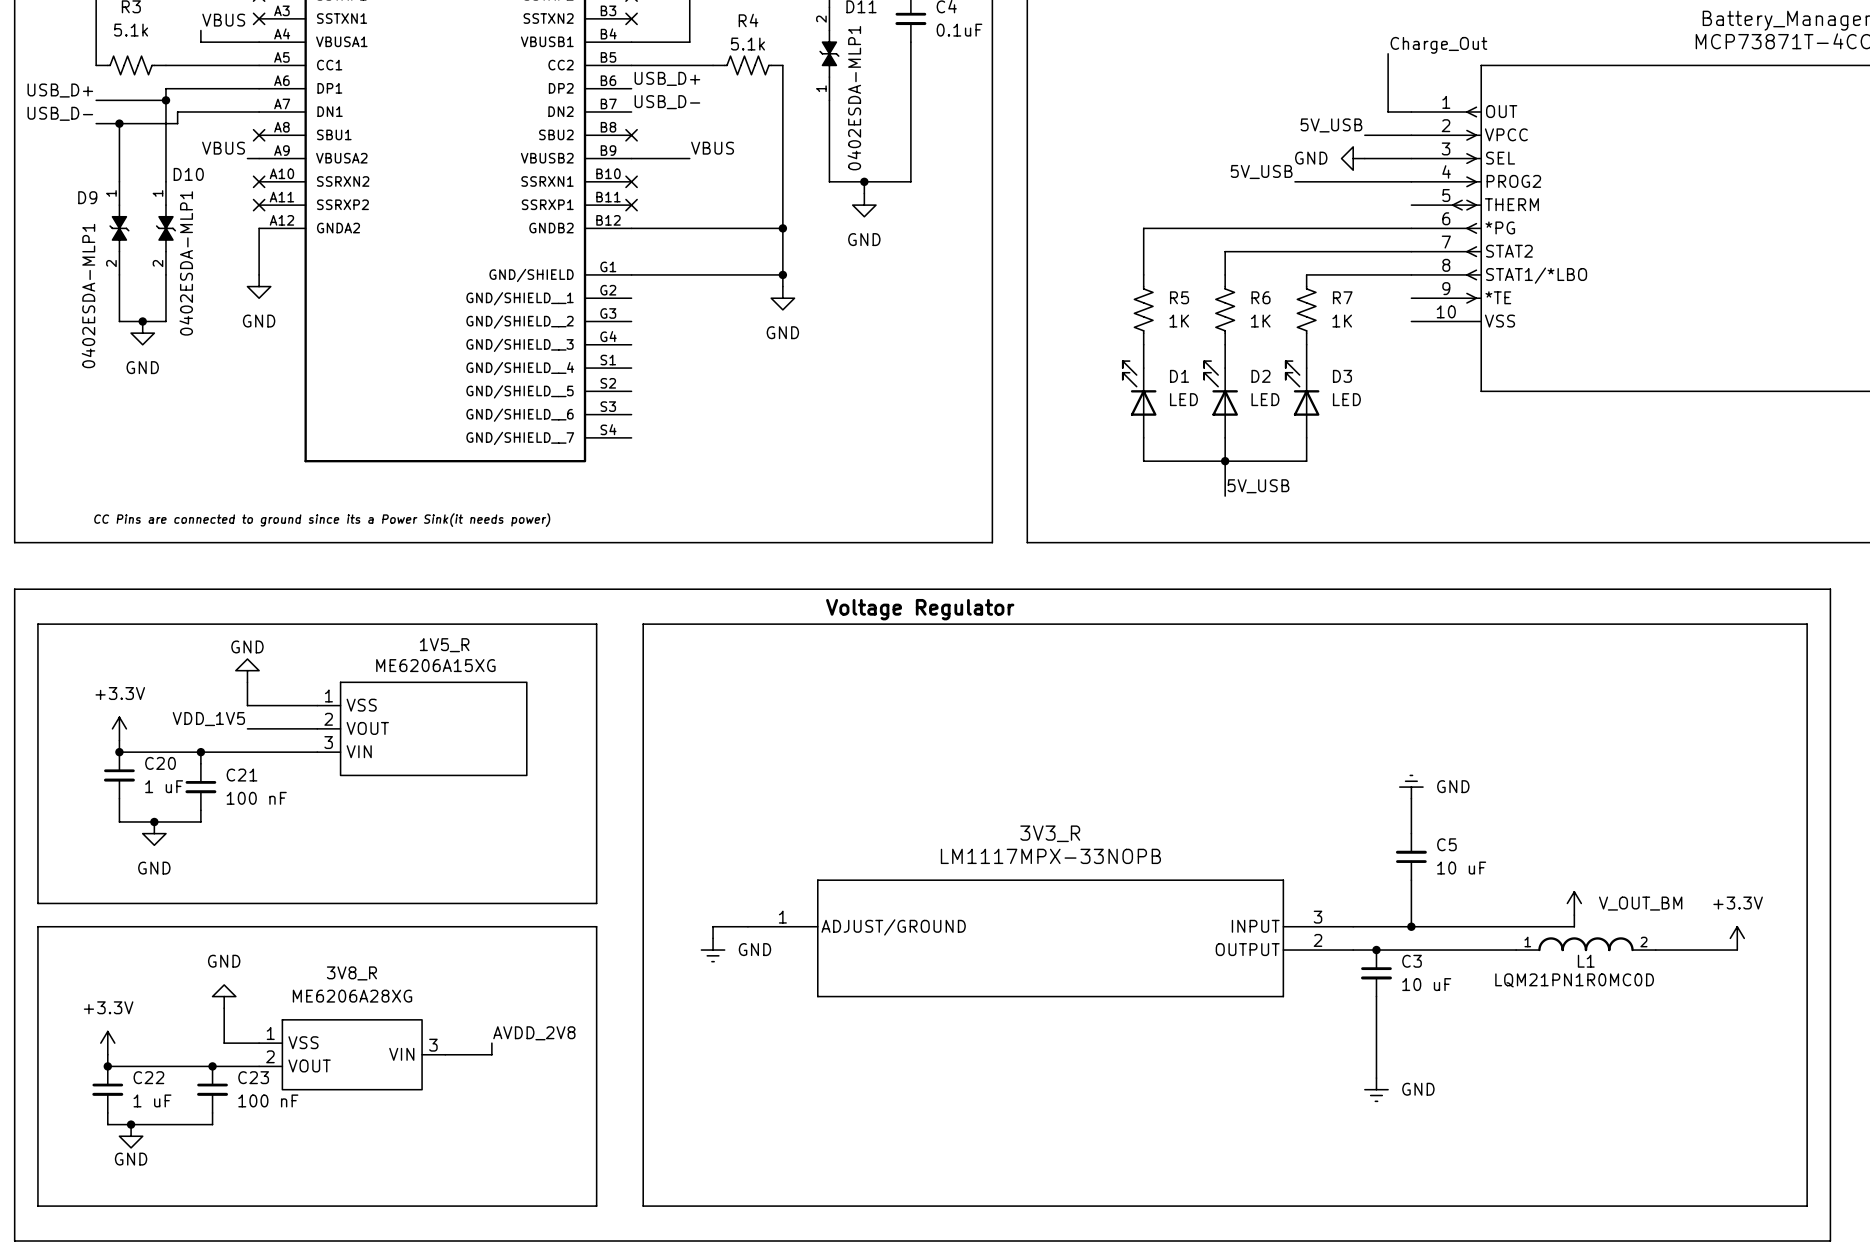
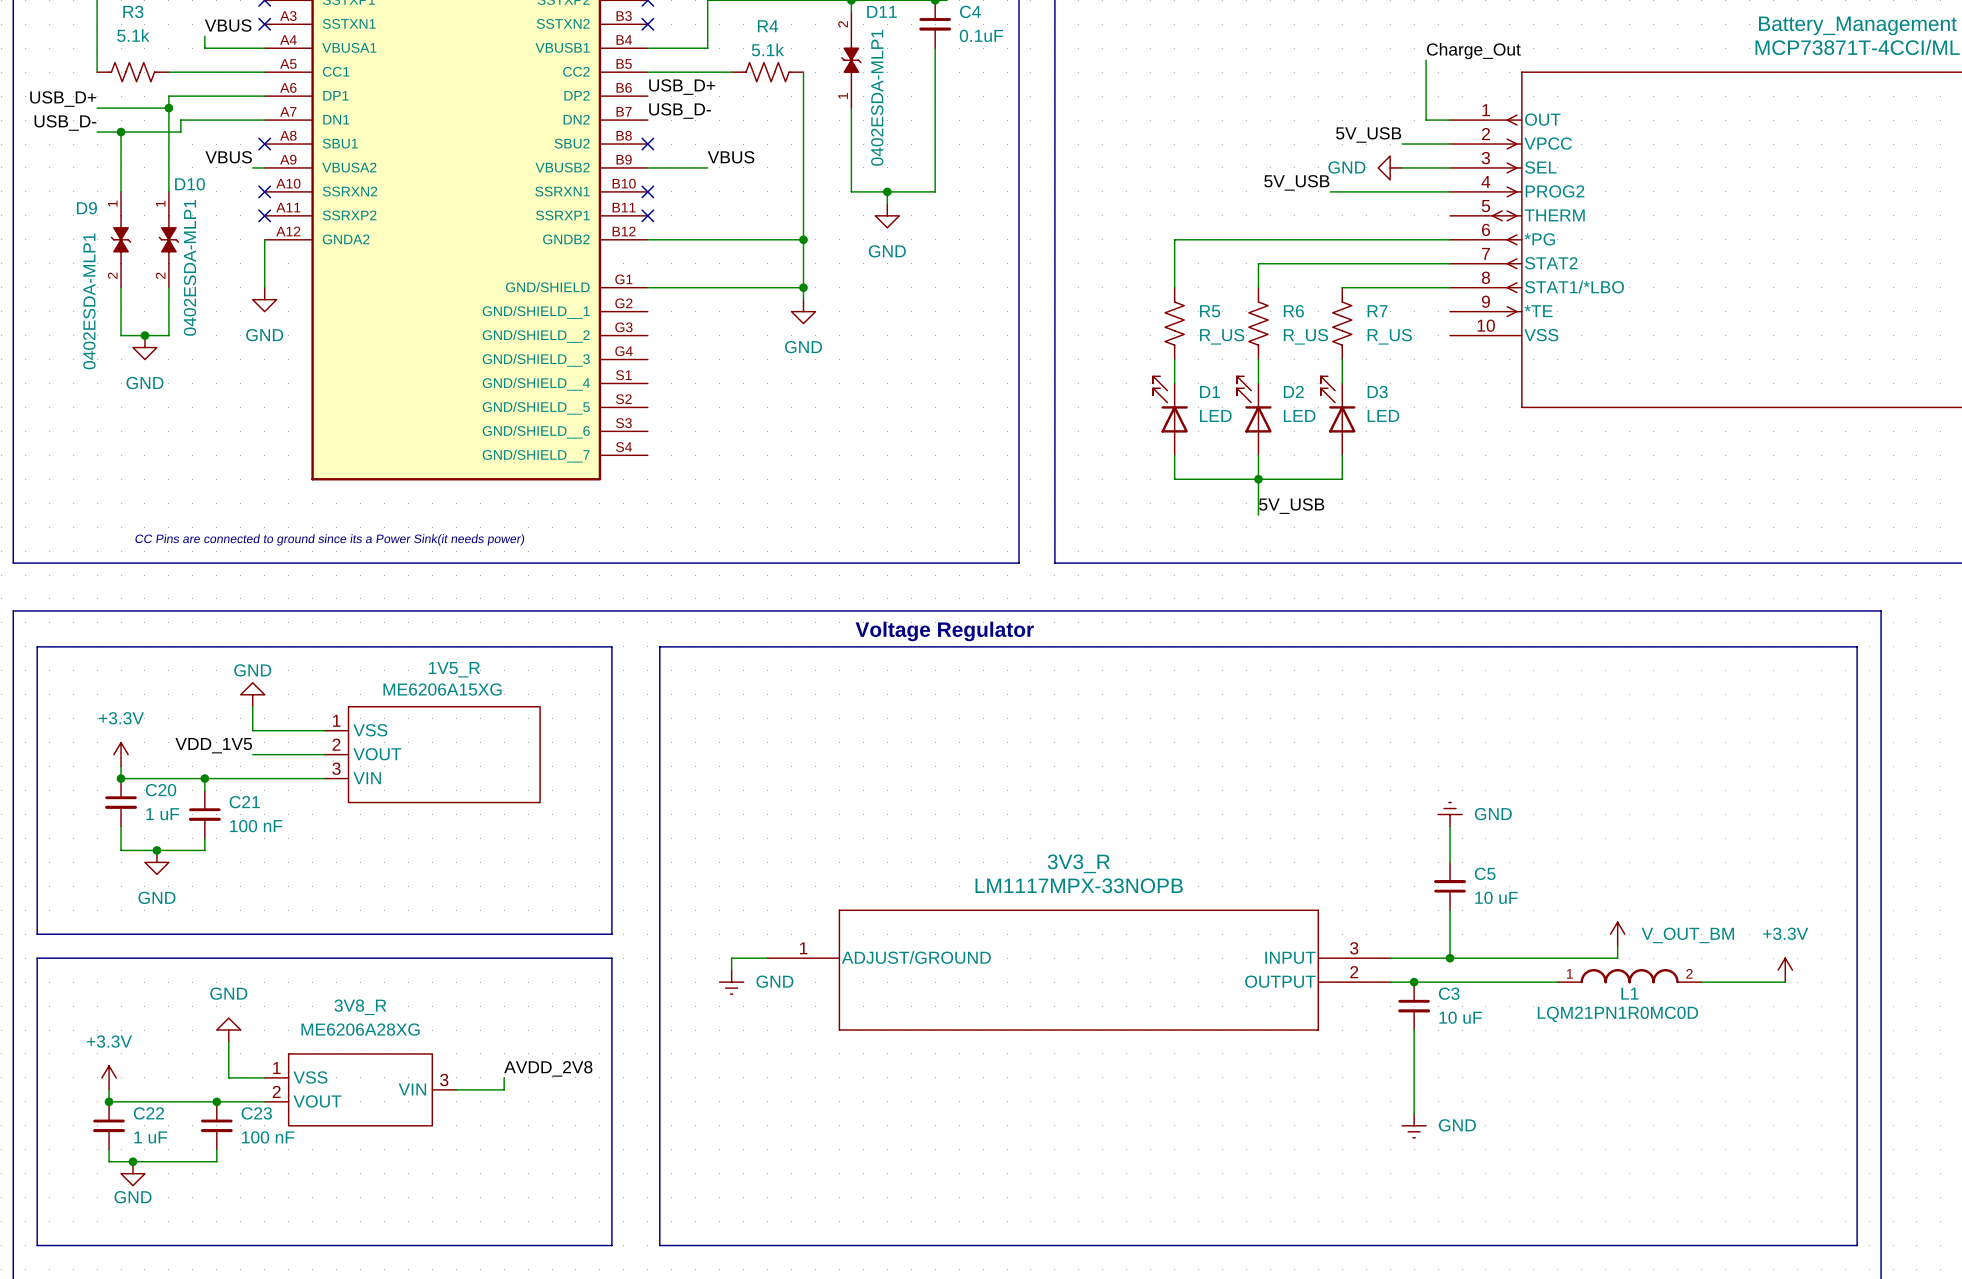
R5 value: 1K (1179, 321) -> R_US (1222, 336)
R6 value: 1K (1260, 321) -> R_US (1305, 336)
R7 value: 1K (1342, 321) -> R_US (1389, 336)

